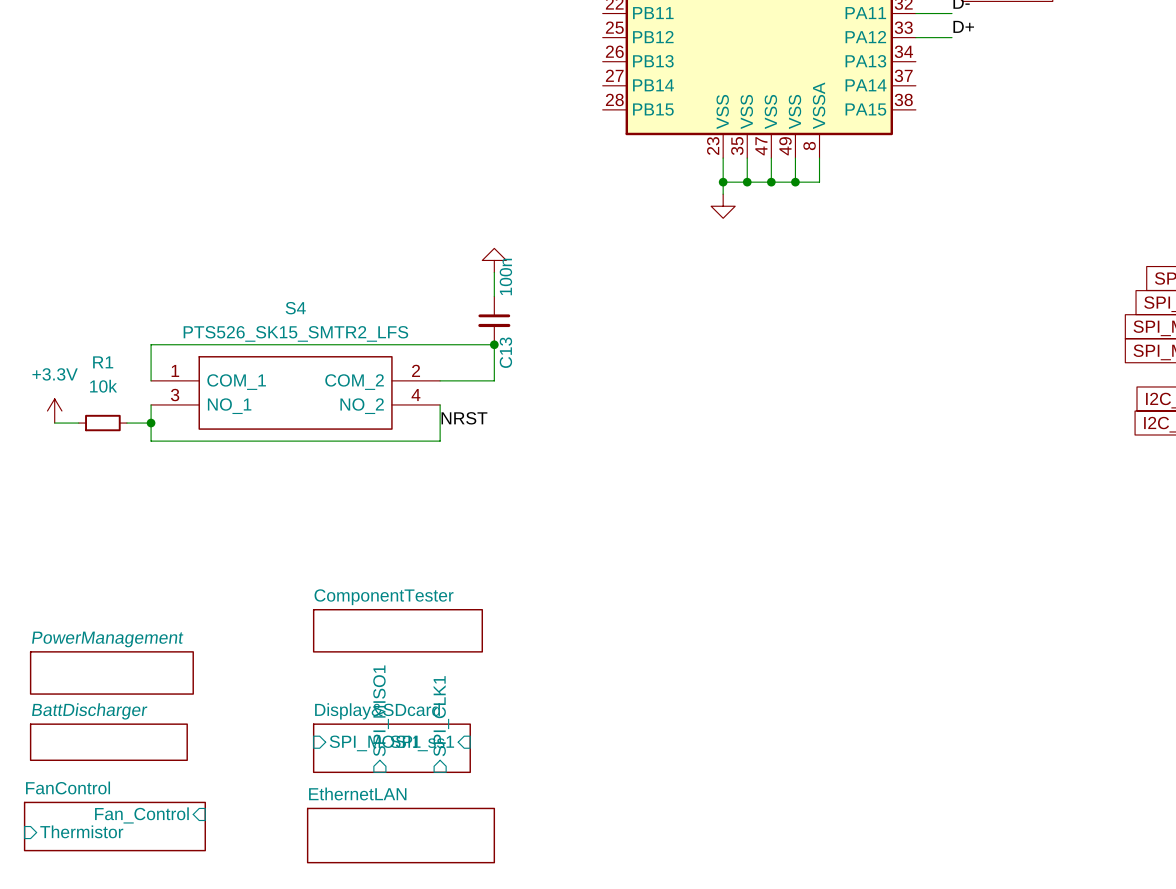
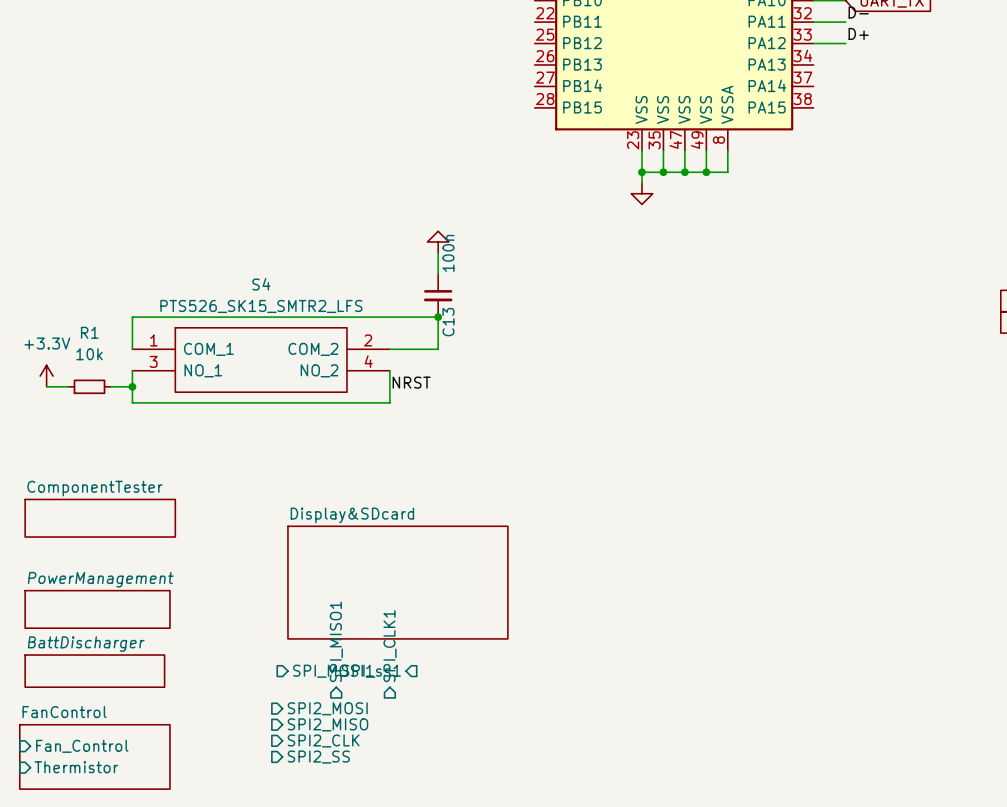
sheet ComponentTester: none -> (100, 518)
sheet ComponentTester: (397, 630) -> none
sheet Display&SDcard: none -> (397, 582)
sheet Display&SDcard: (391, 748) -> none
sheet pin: none -> SPI2_MOSI (327, 708)
sheet pin: none -> SPI2_MISO (327, 724)
sheet pin rotation: 0° (141, 815) -> 180° (82, 746)
sheet pin: none -> SPI2_CLK (323, 740)
sheet FanControl: (114, 826) -> none
sheet pin position: Thermistor (81, 831) -> Thermistor (76, 767)
sheet EthernetLAN: (400, 835) -> none
sheet FanControl: none -> (94, 756)
sheet pin: none -> SPI2_SS (318, 757)

